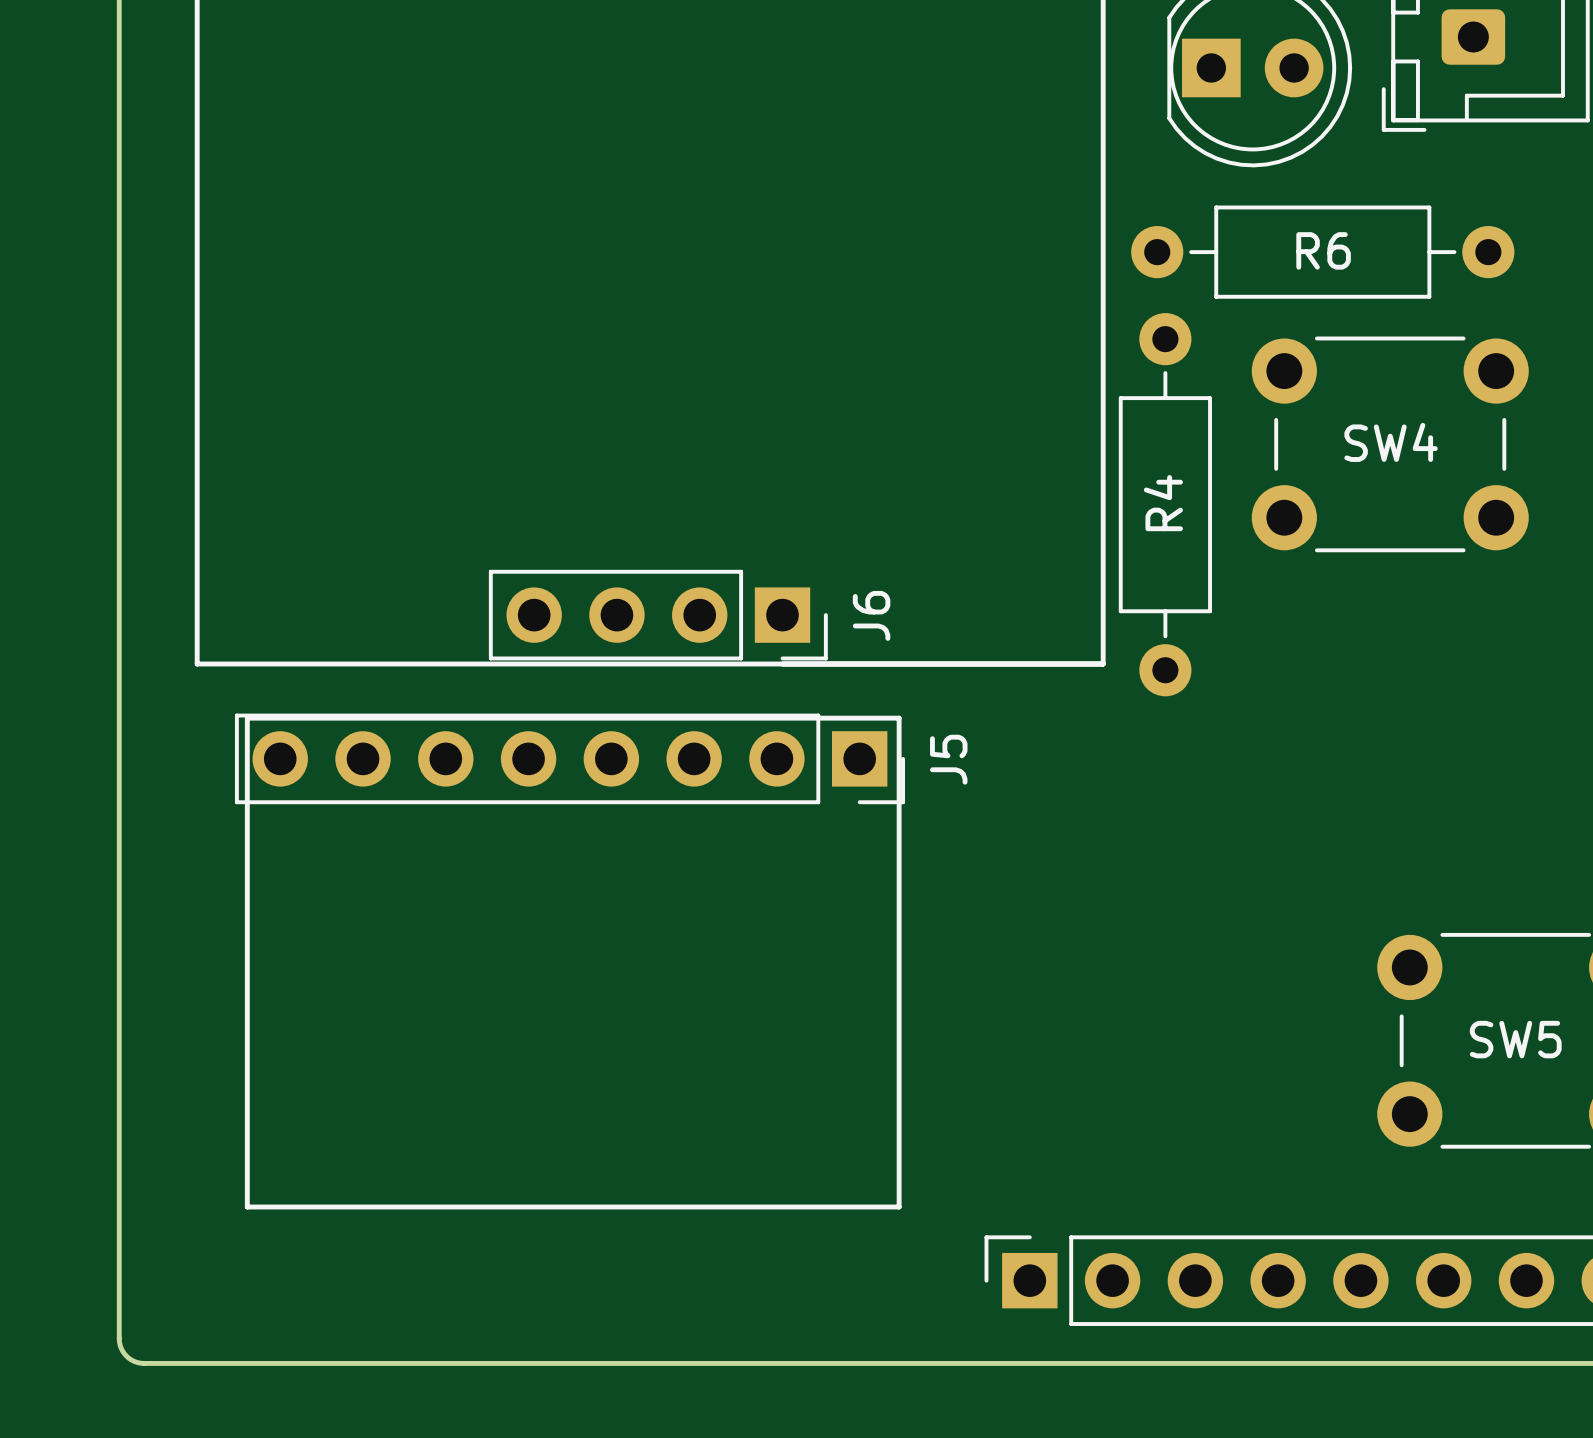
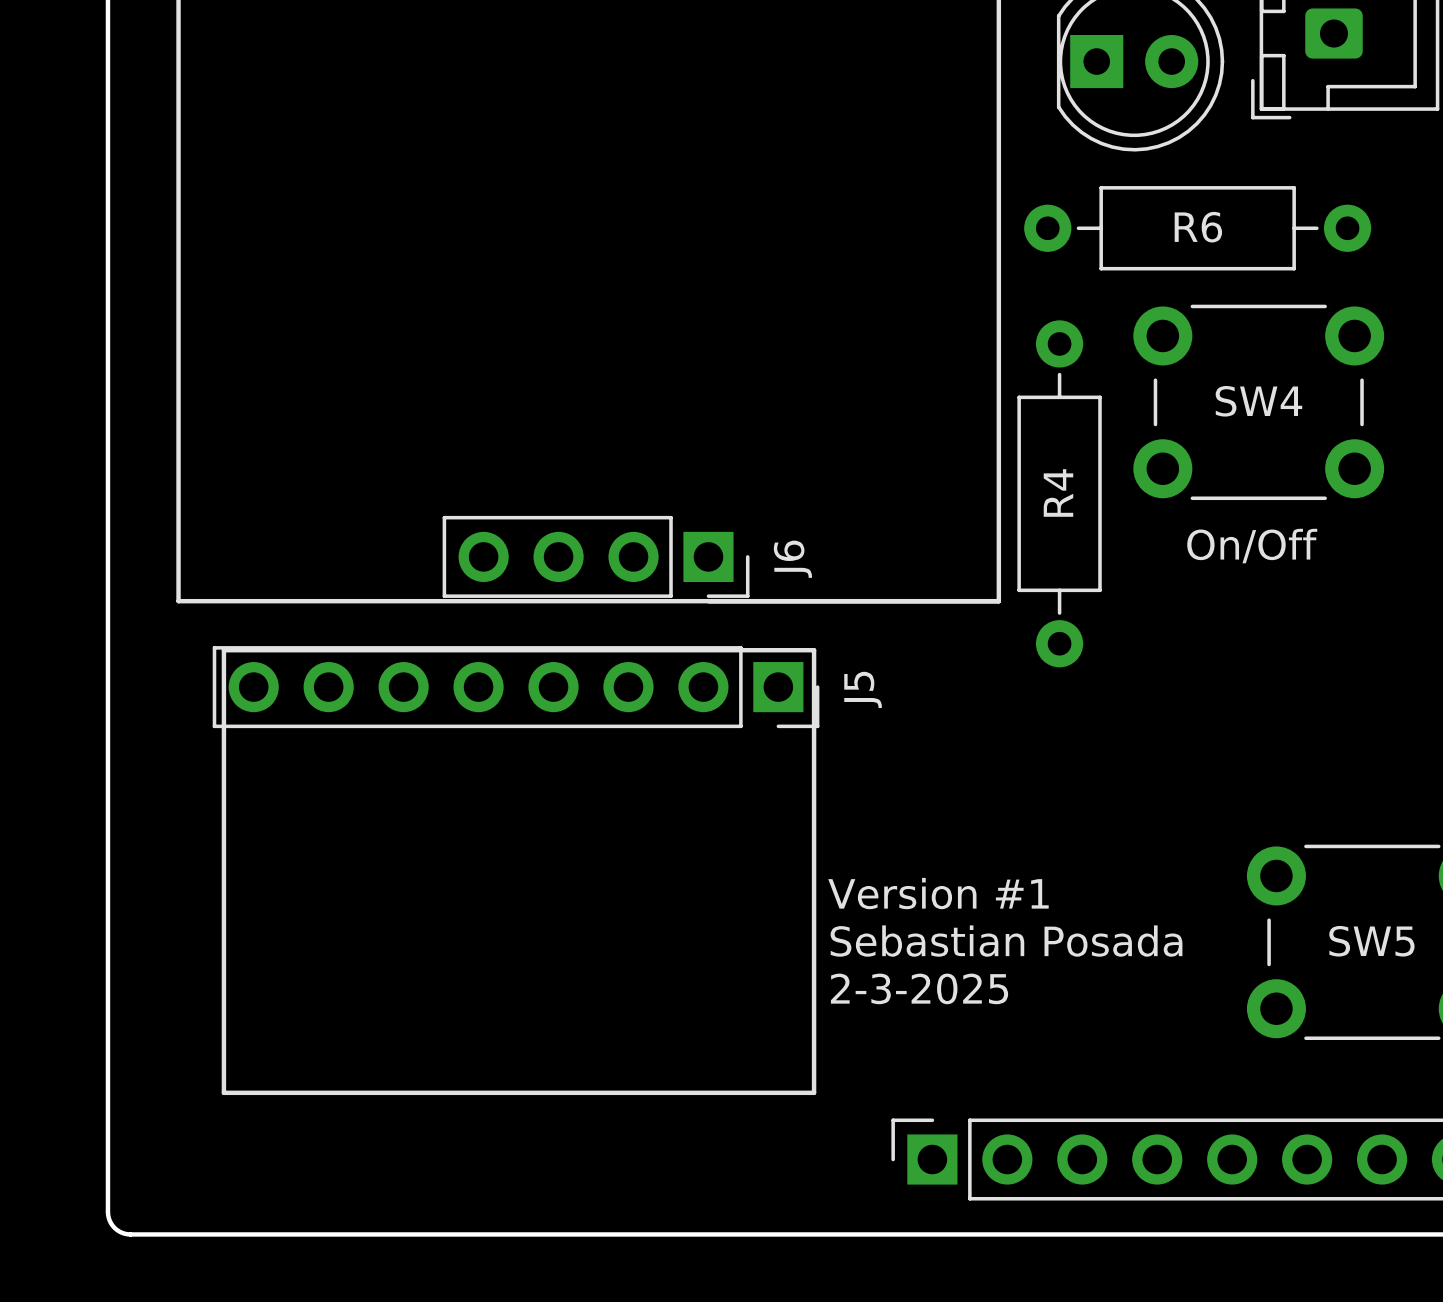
R4 position: (1165, 504) -> (1059, 493)
text: none -> On/Off (1252, 546)
text: none -> Version #1 (938, 893)
text: none -> Sebastian Posada (1006, 941)
text: none -> 2-3-2025 (919, 988)

